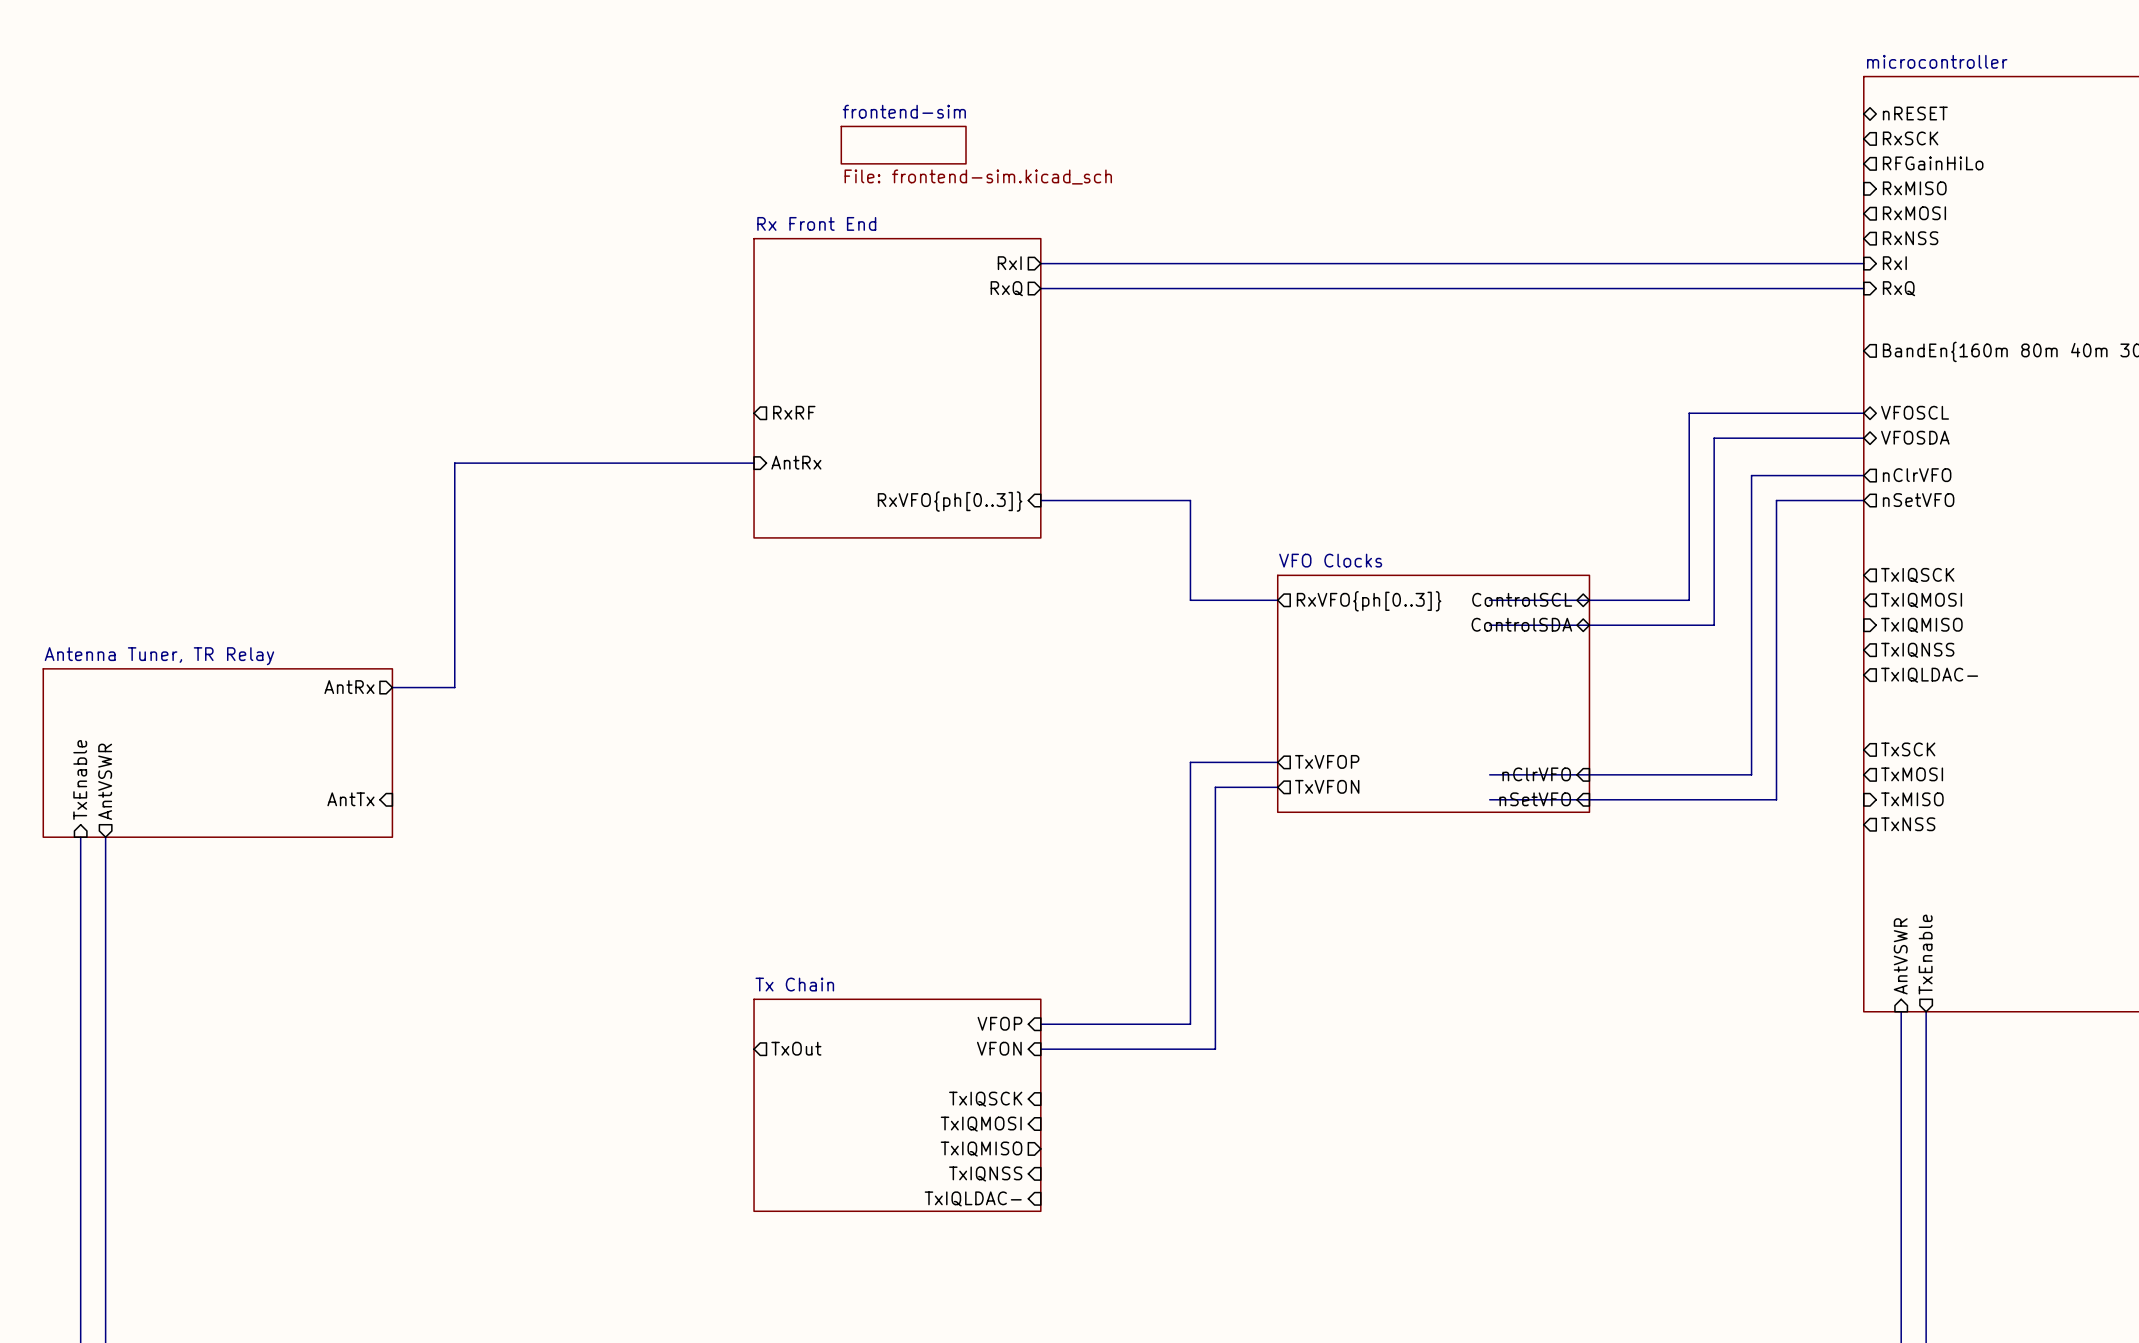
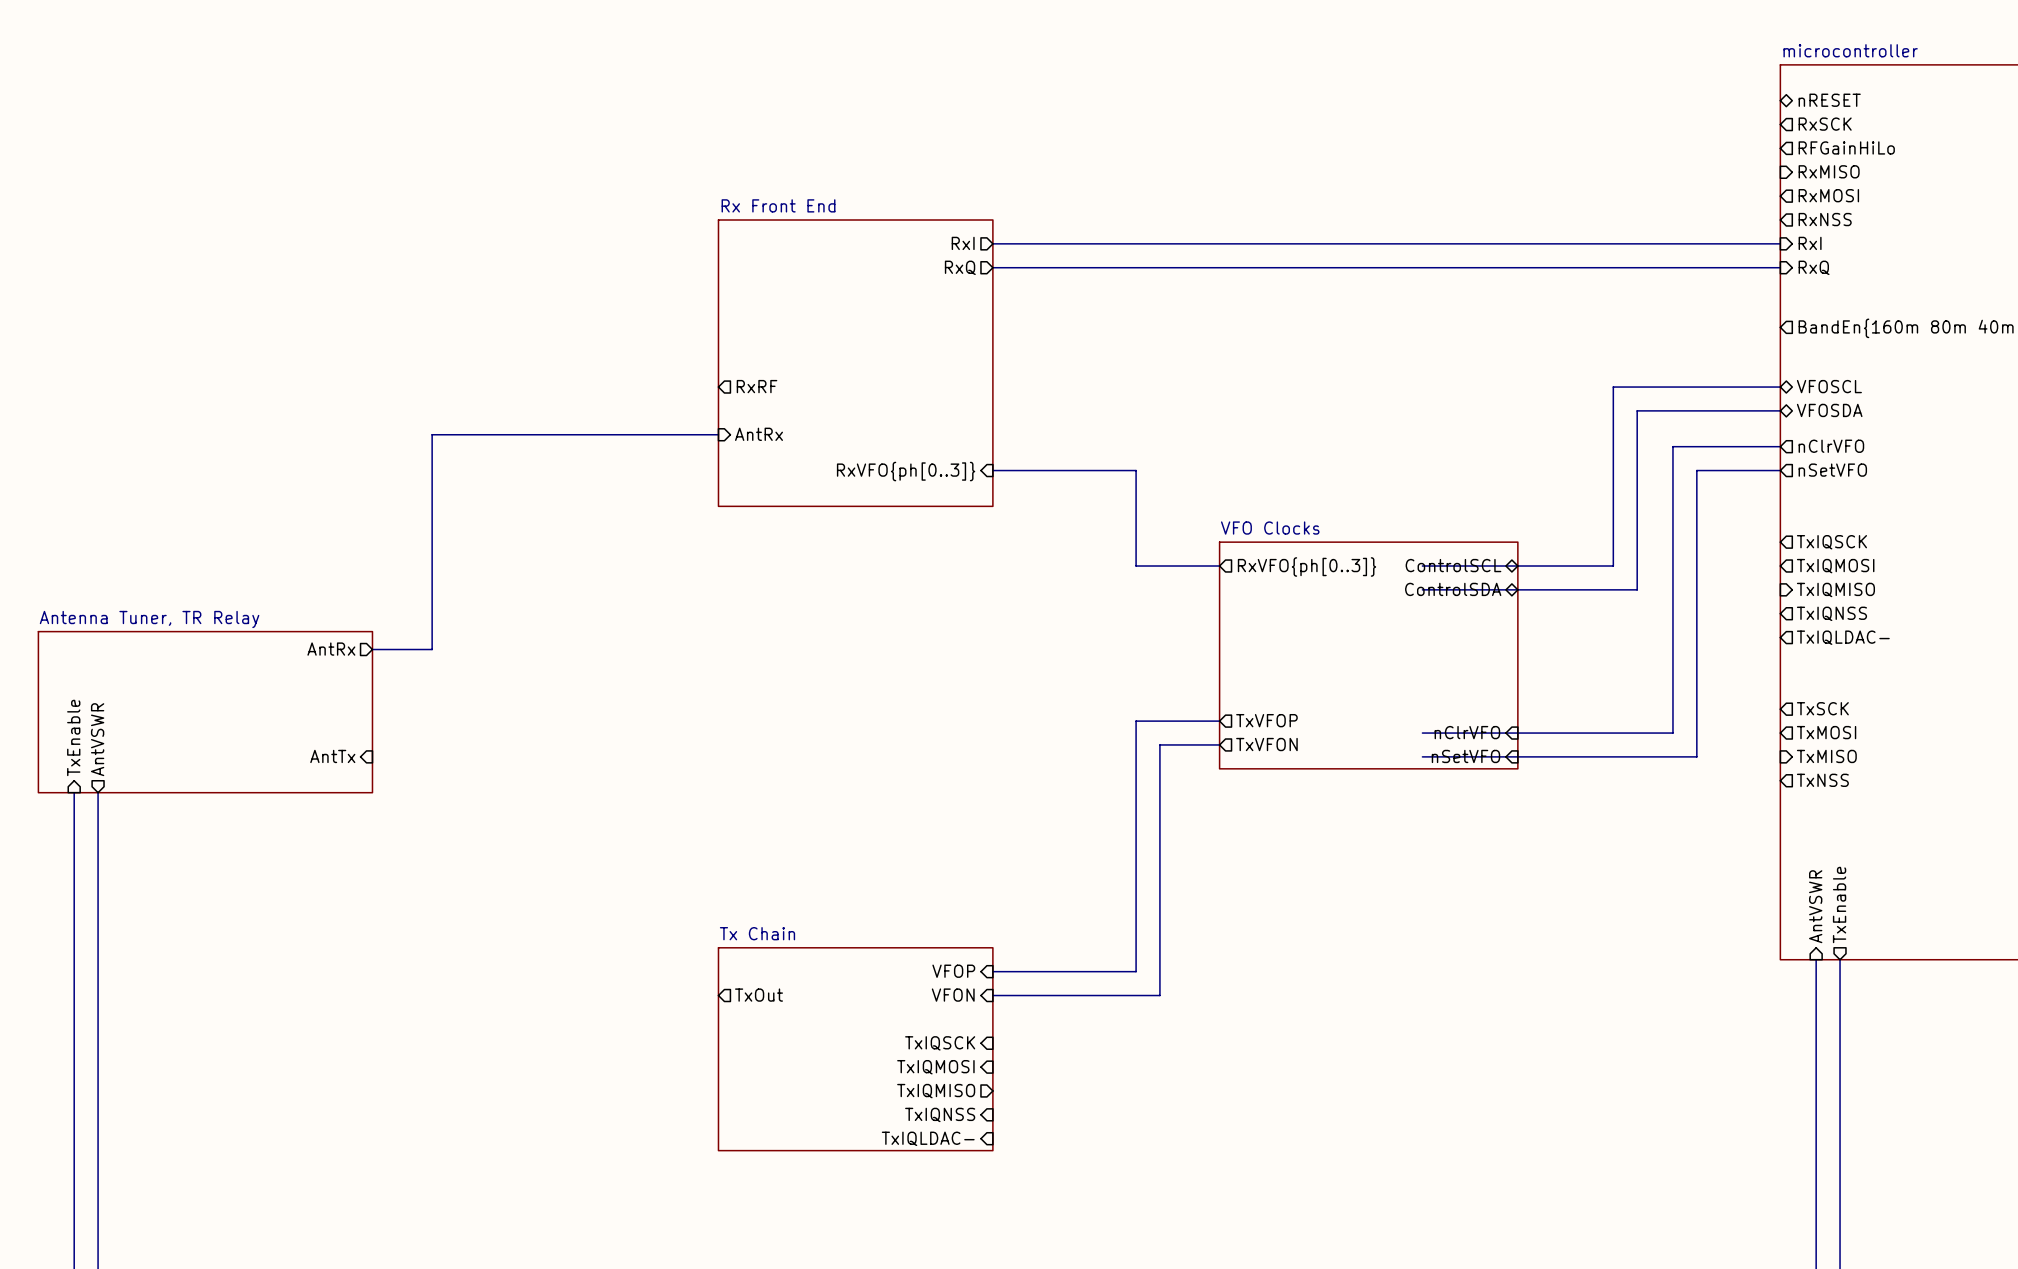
sheet frontend-sim: File: frontend-sim.kicad_sch (903, 145) -> none

